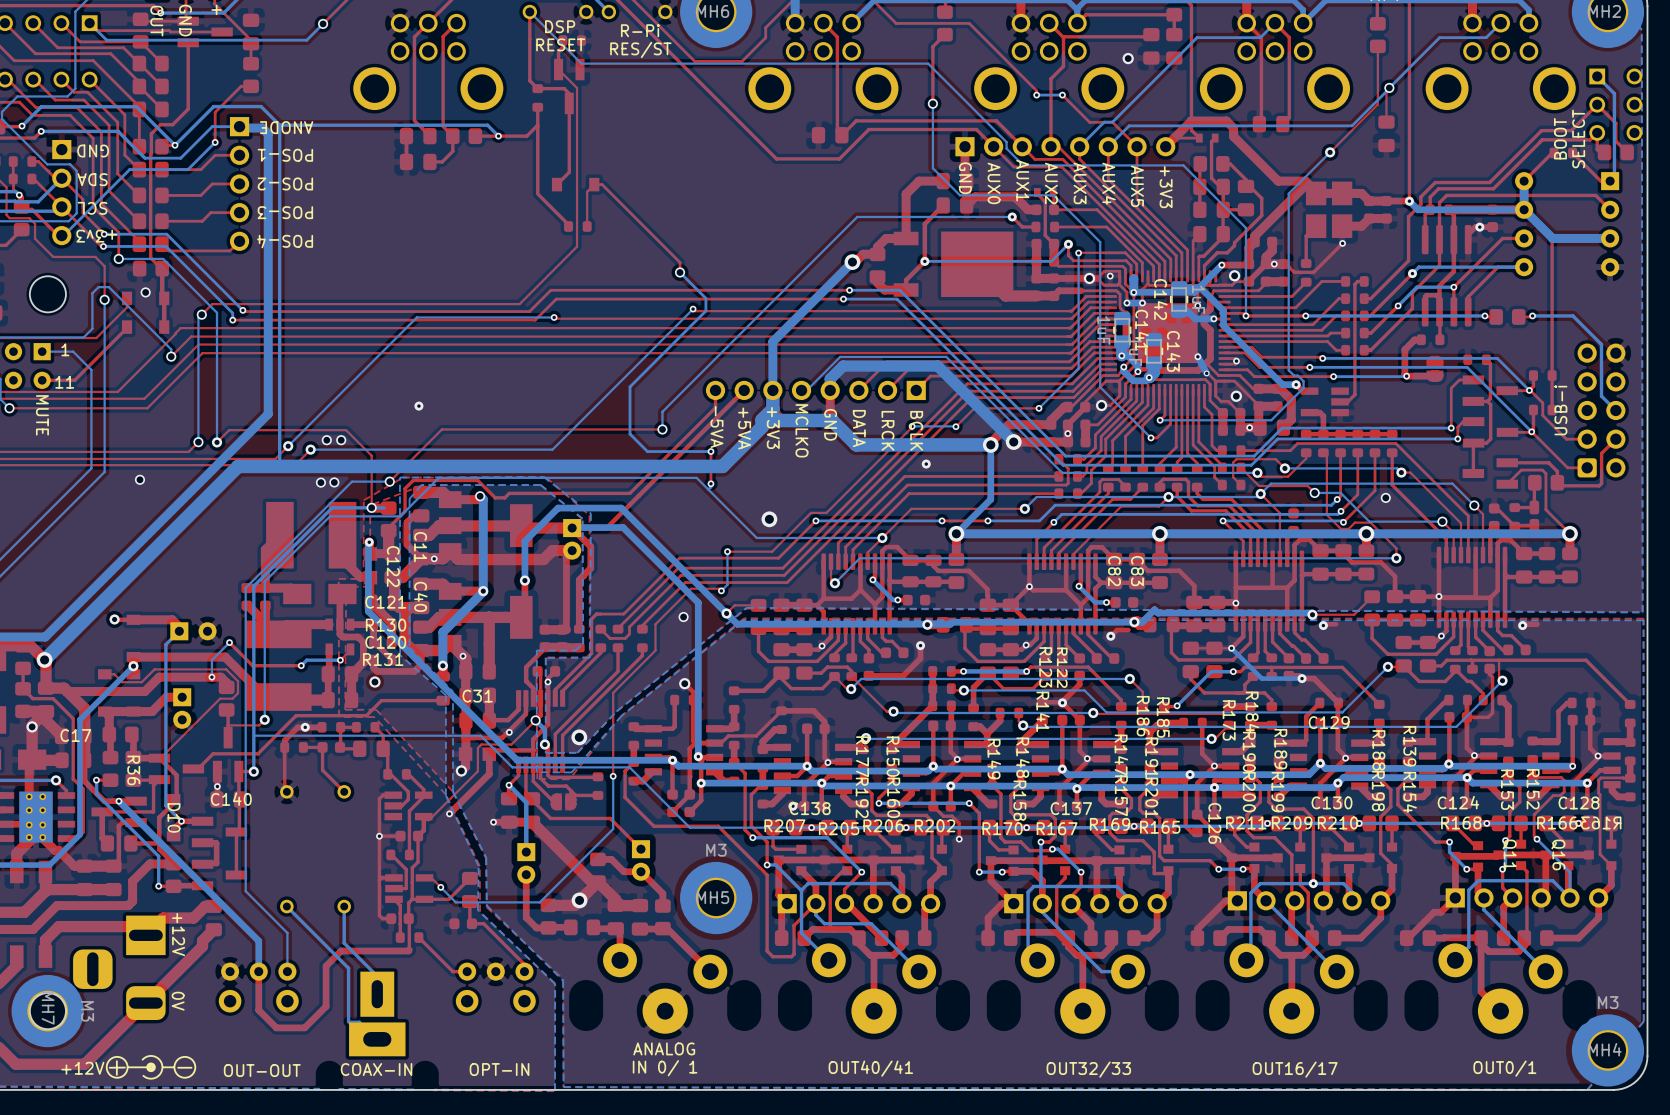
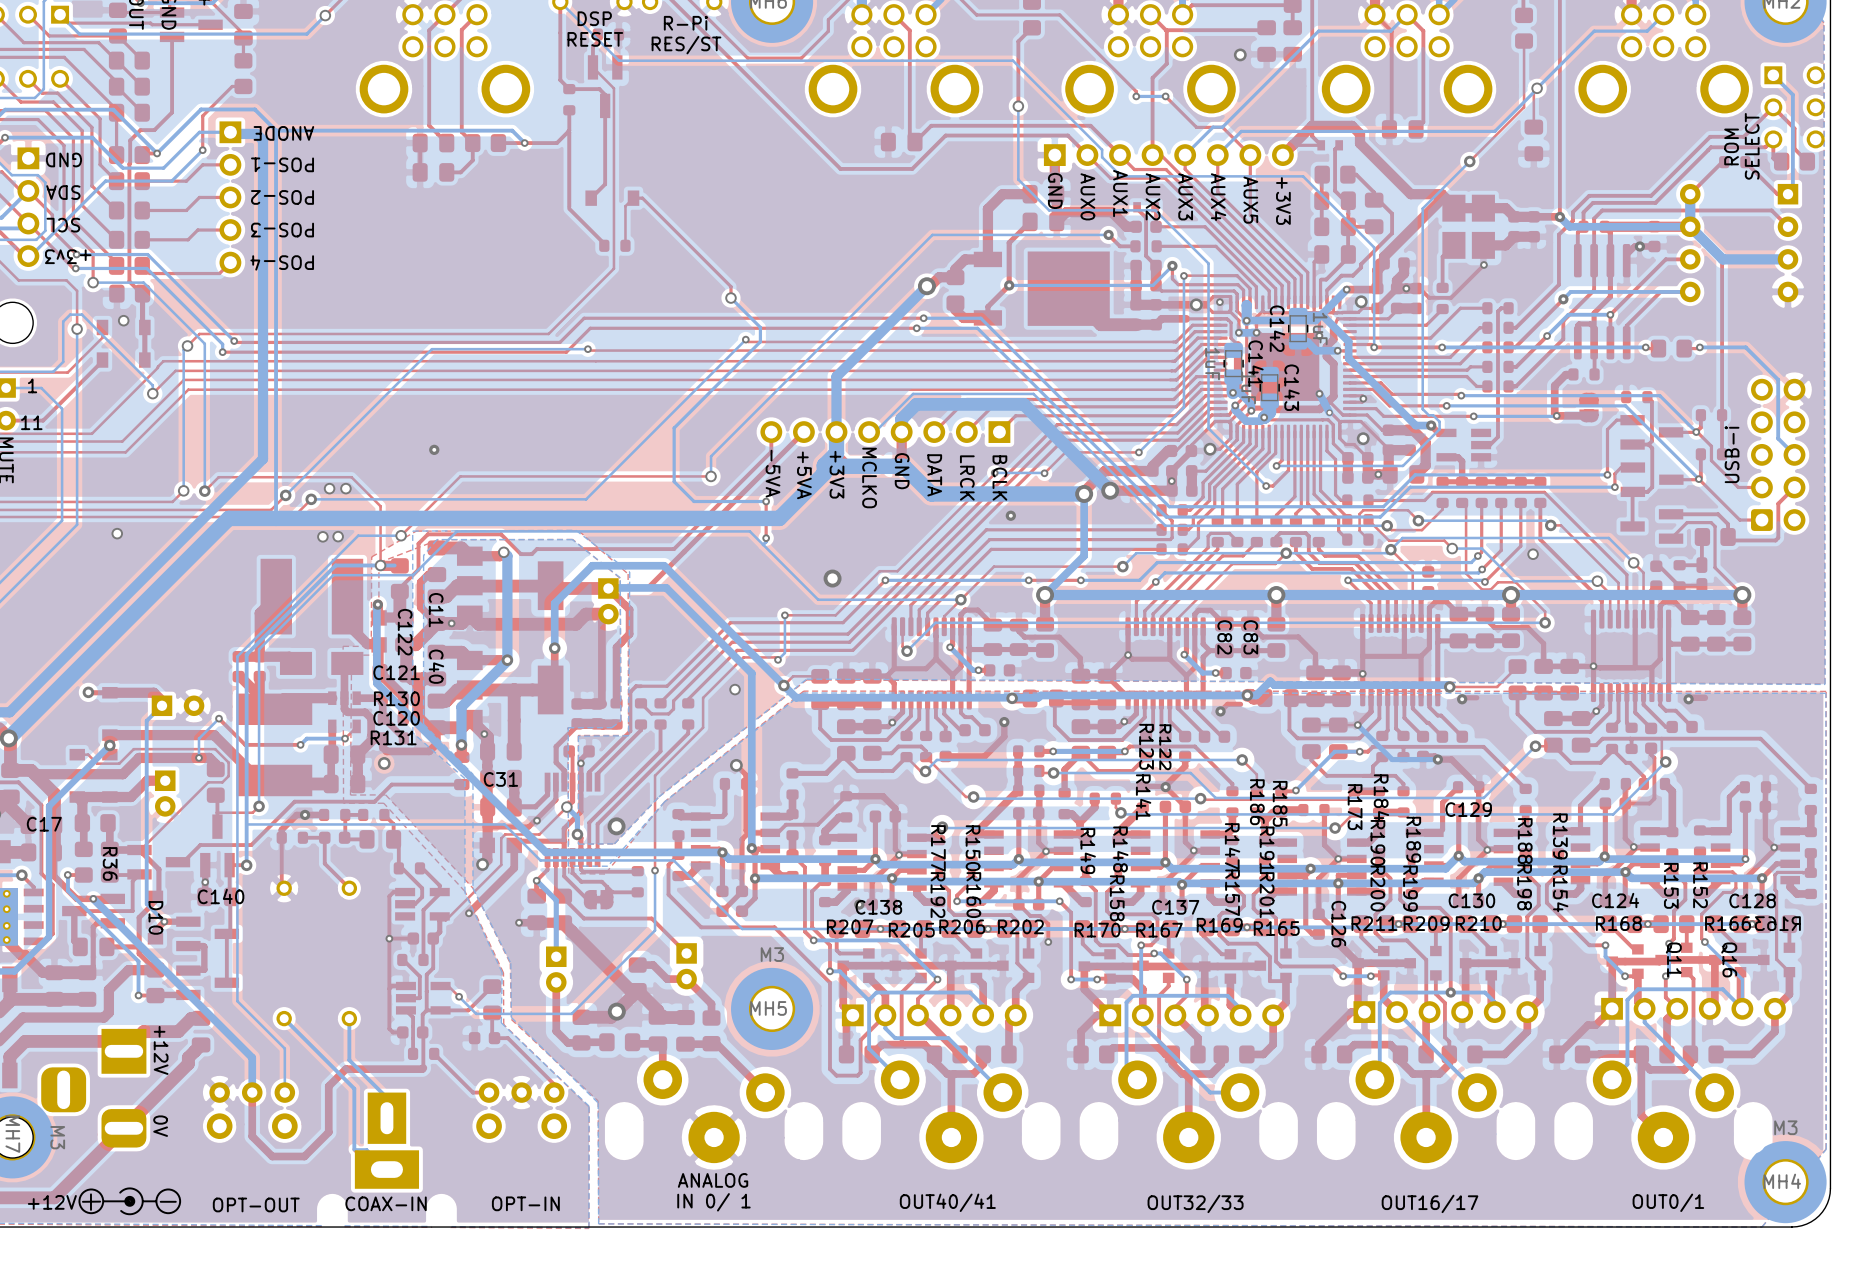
text: BOOT (1560, 138) -> ROM (1731, 146)
part footprint: [550, 793, 577, 811] -> [583, 890, 614, 910]
text: OUT-OUT (262, 1070) -> OPT-OUT (256, 1204)

